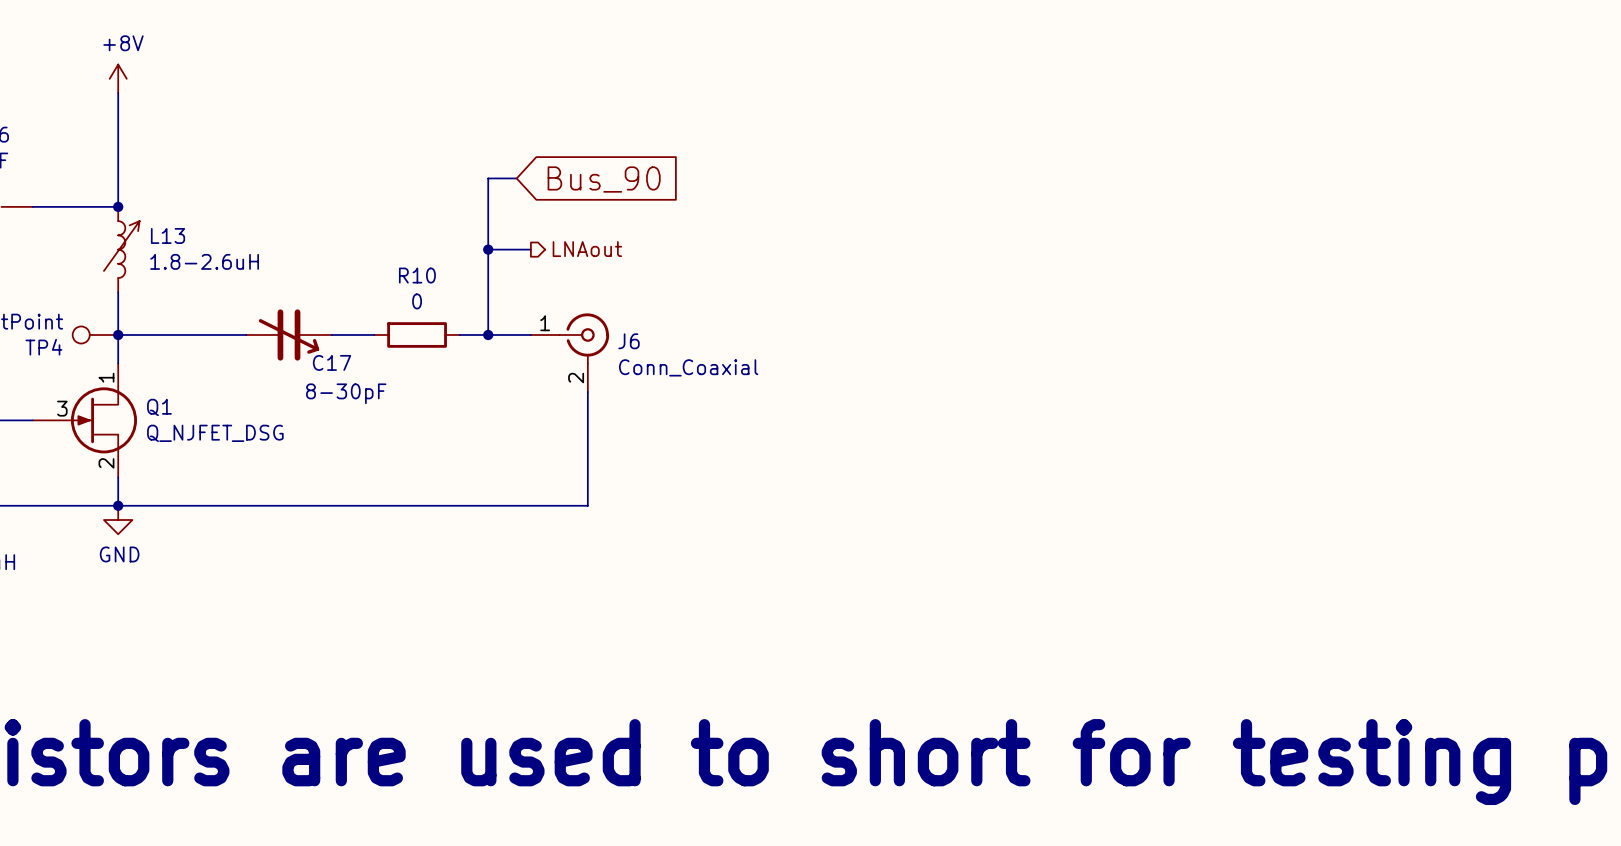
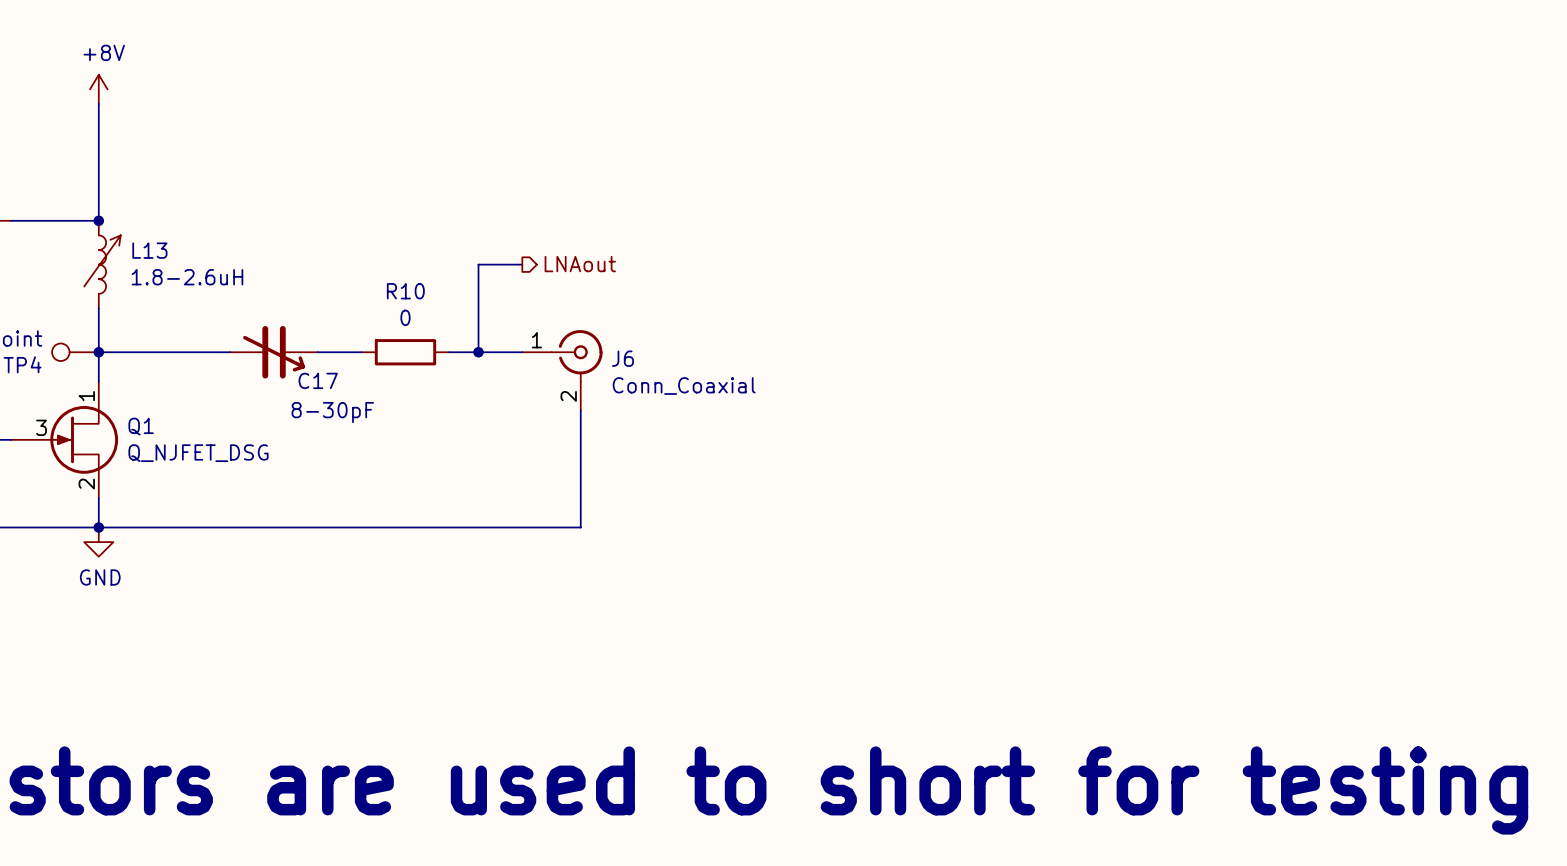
wire: (516, 178) (488, 178) (488, 249) -> none
global label: Bus_90 (604, 179) -> none
junction: (488, 249) -> none

